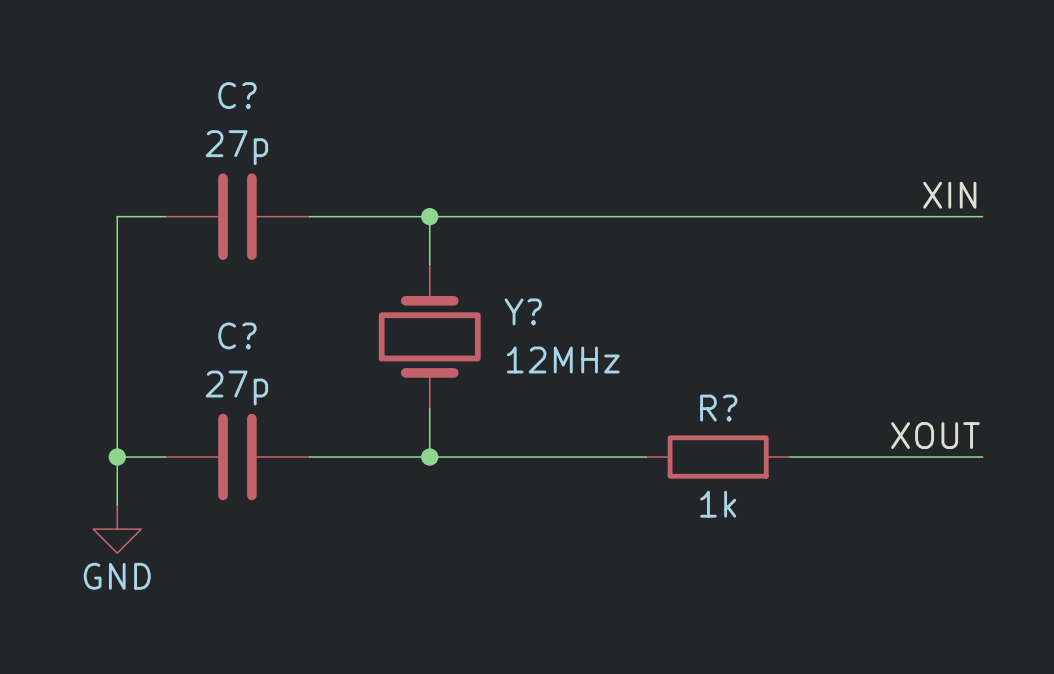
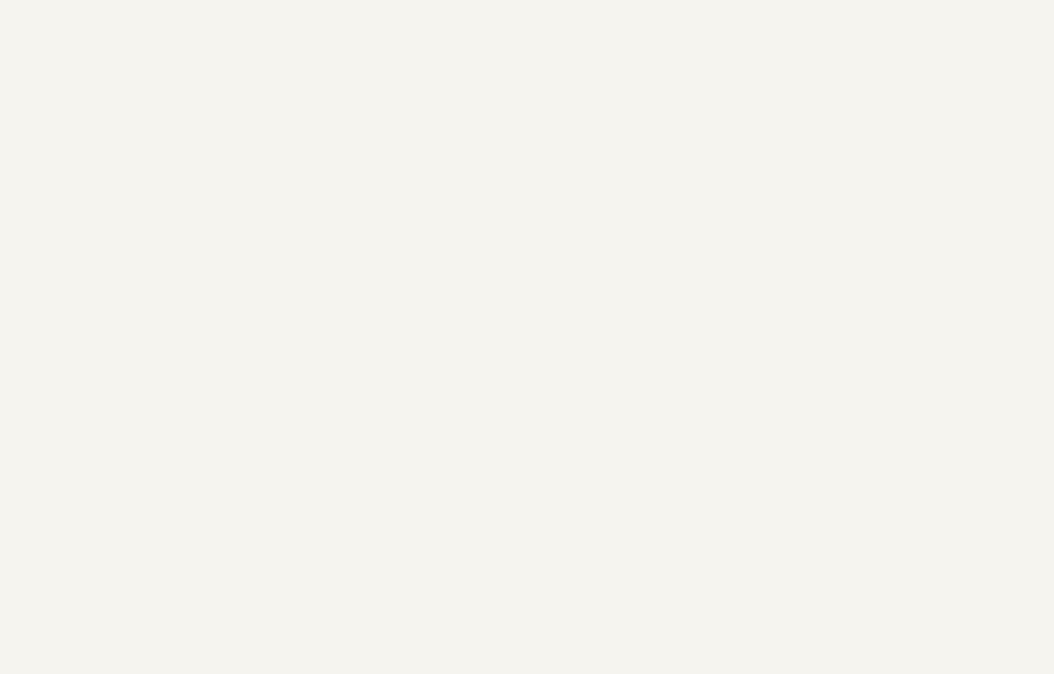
label: XIN (949, 195) -> none
wire: (165, 216) (117, 216) (117, 505) -> none
C?: 27p (237, 216) -> none
wire: (309, 216) (982, 216) -> none
wire: (429, 216) (429, 264) -> none
junction: (429, 216) -> none
Y?: 12MHz (429, 336) -> none
wire: (429, 408) (429, 457) -> none
label: XOUT (935, 435) -> none
wire: (117, 457) (165, 457) -> none
junction: (117, 457) -> none
C?: 27p (237, 457) -> none
wire: (309, 457) (646, 457) -> none
junction: (429, 457) -> none
R?: 1k (718, 457) -> none
wire: (790, 457) (982, 457) -> none
power symbol: GND (117, 529) -> none

